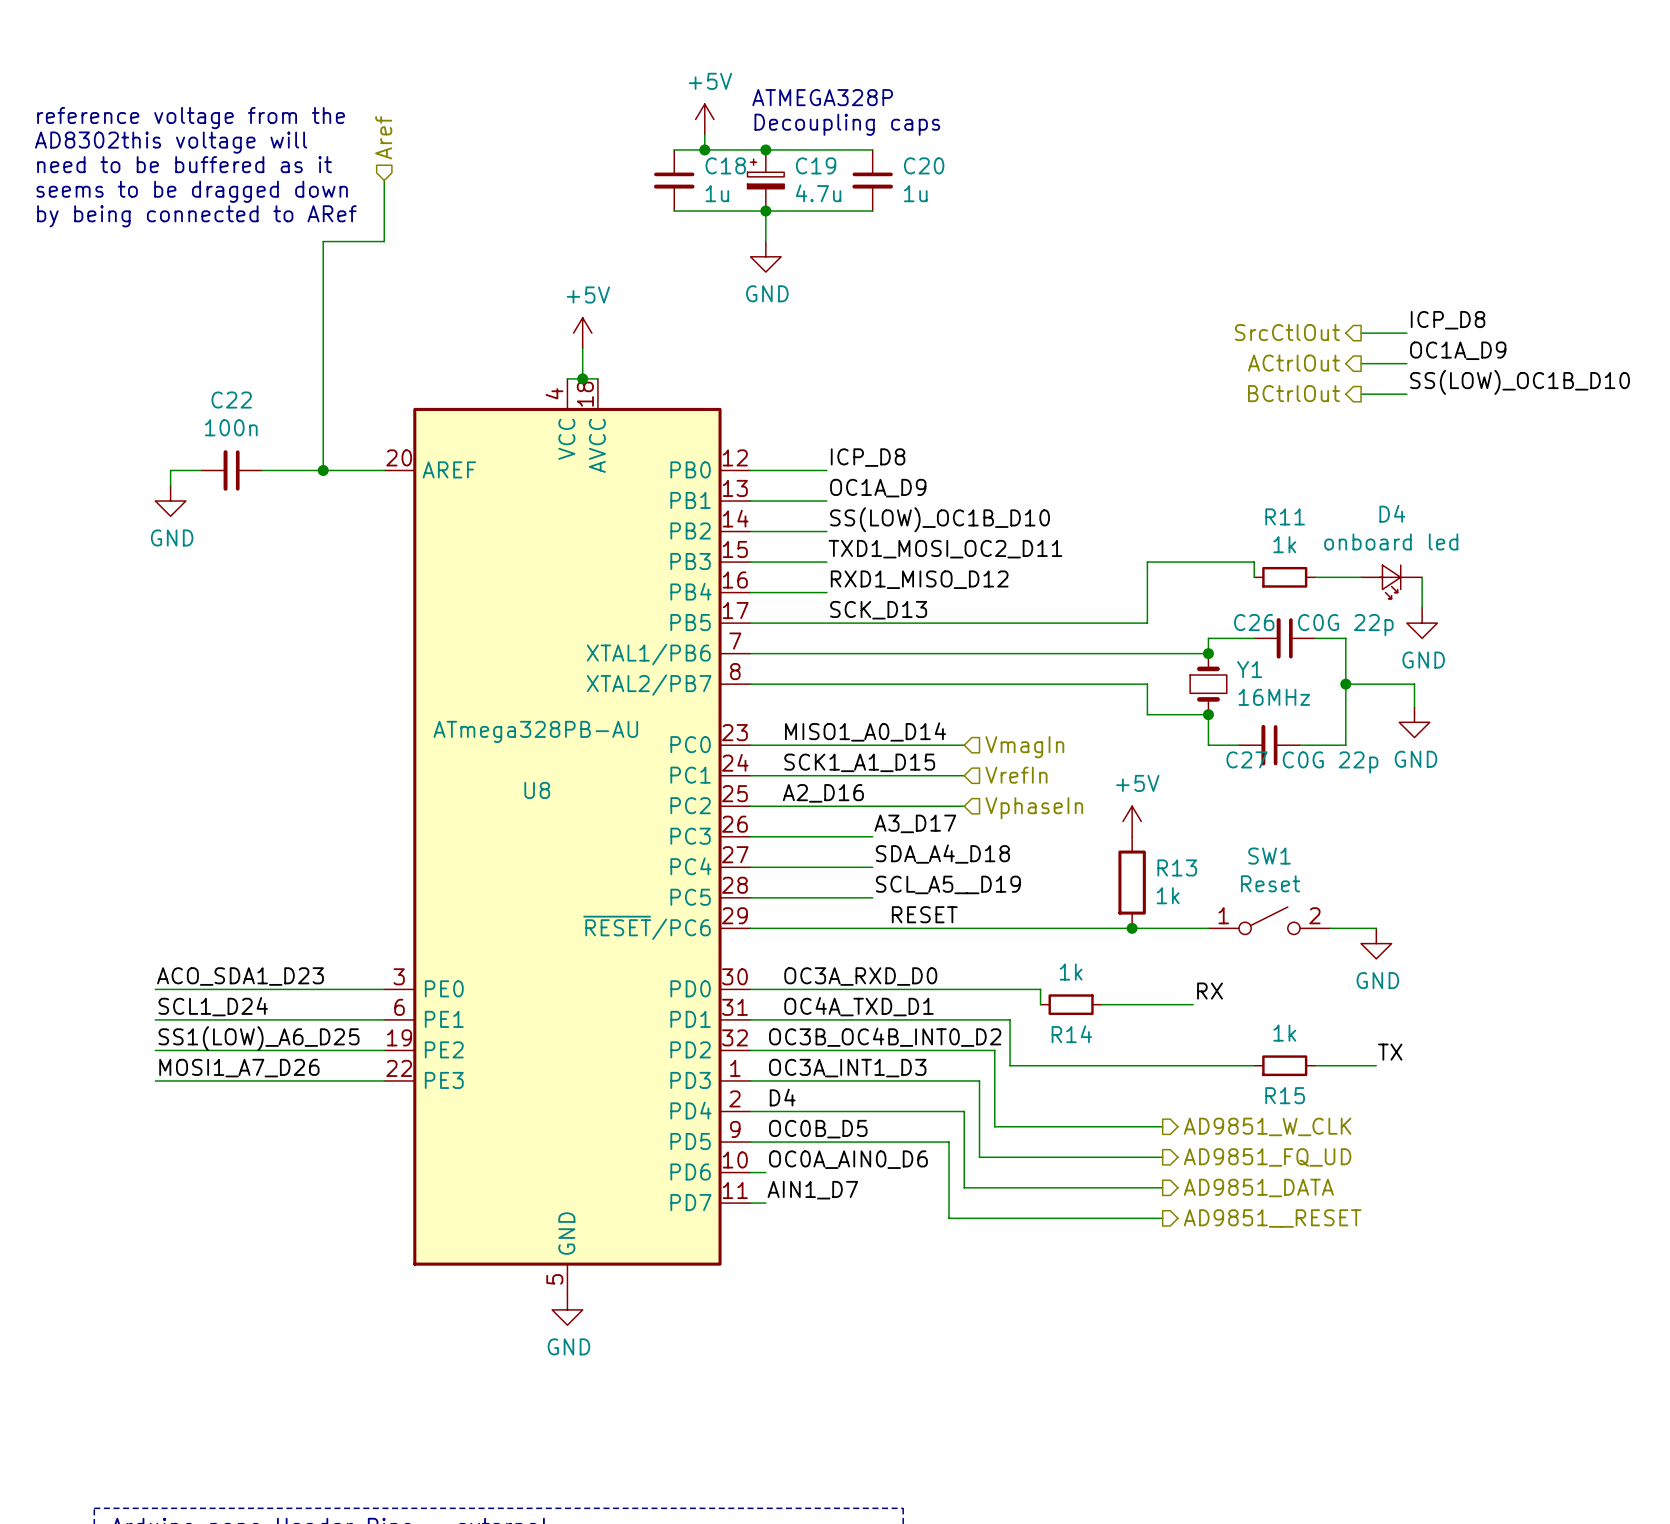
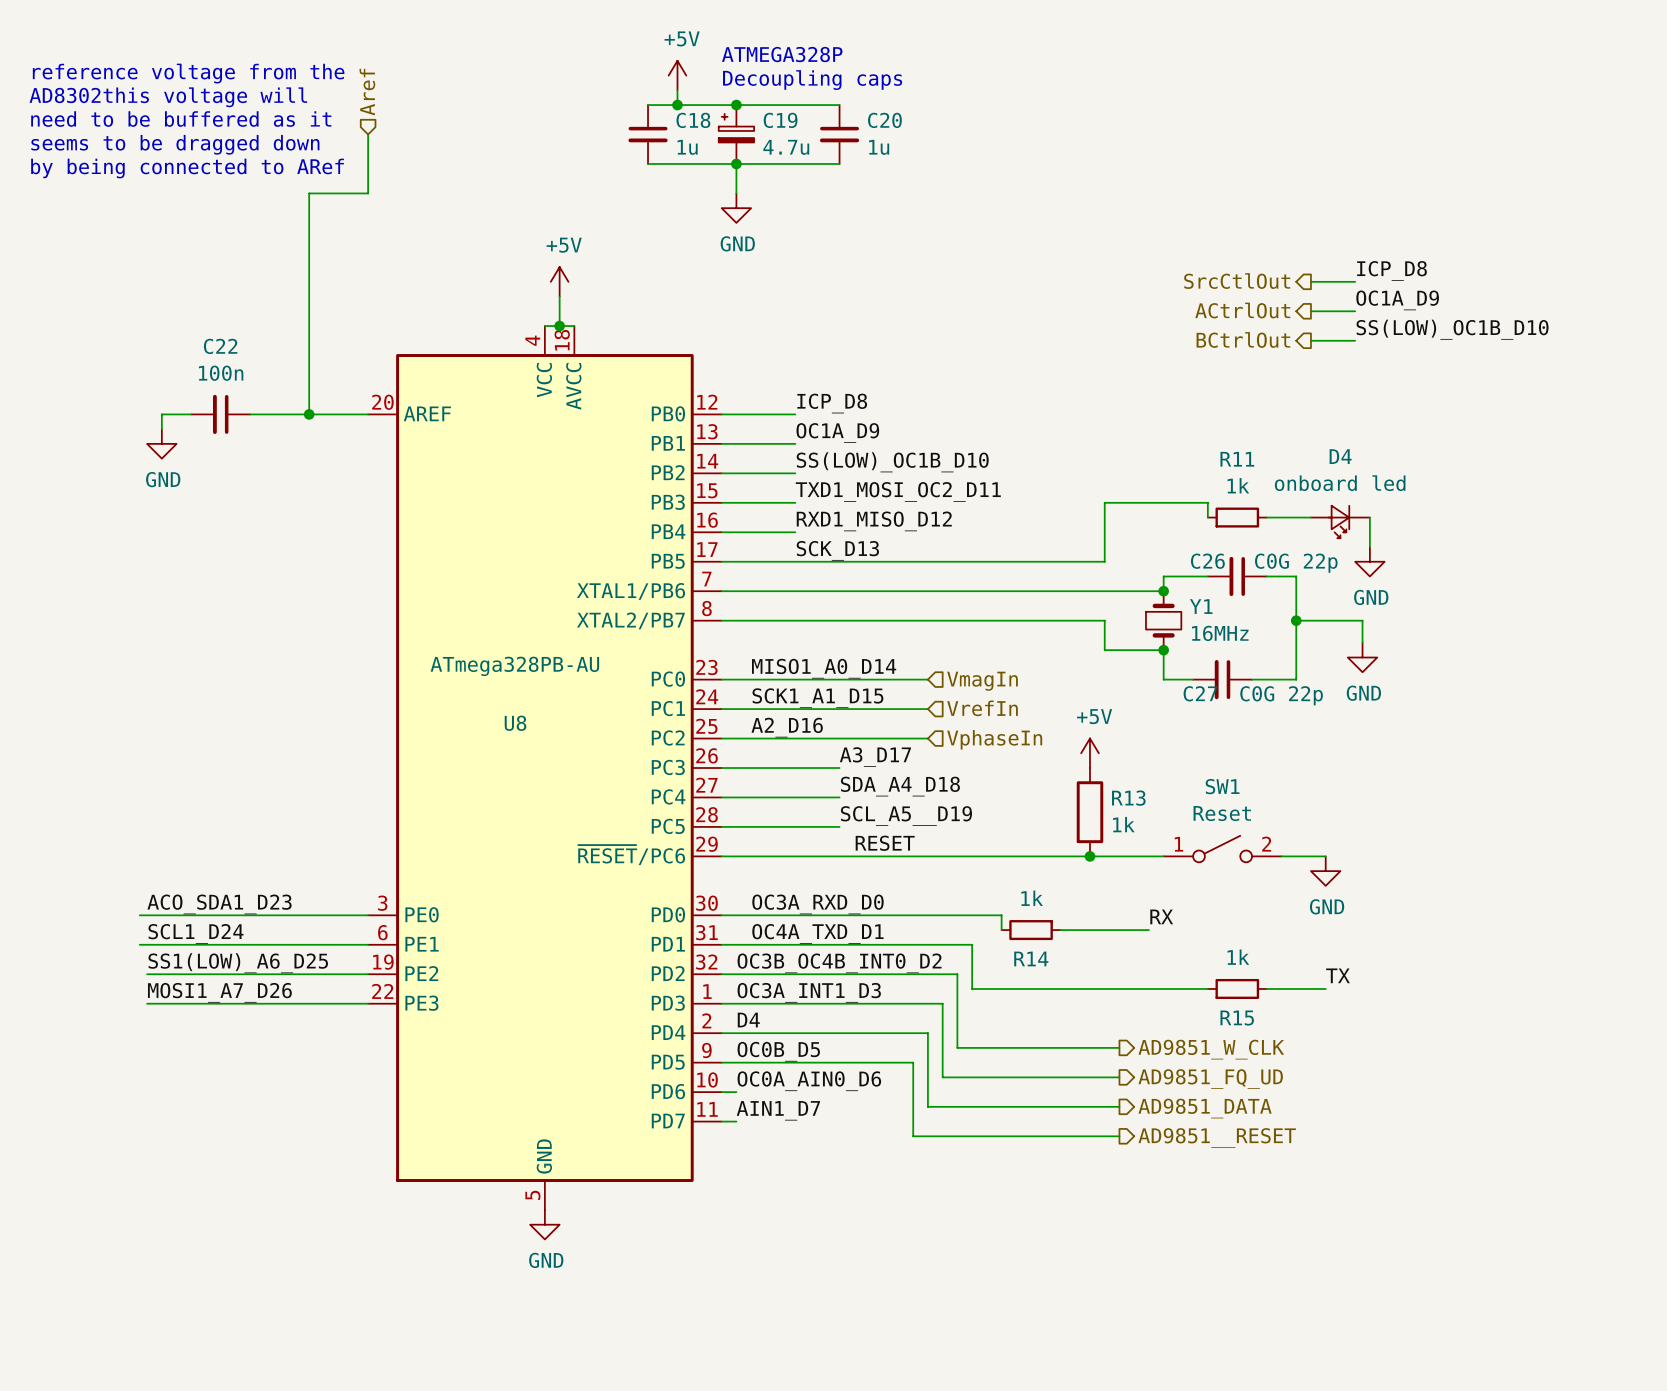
wire: none -> (139, 915) (147, 915)
wire: none -> (139, 944) (147, 944)

